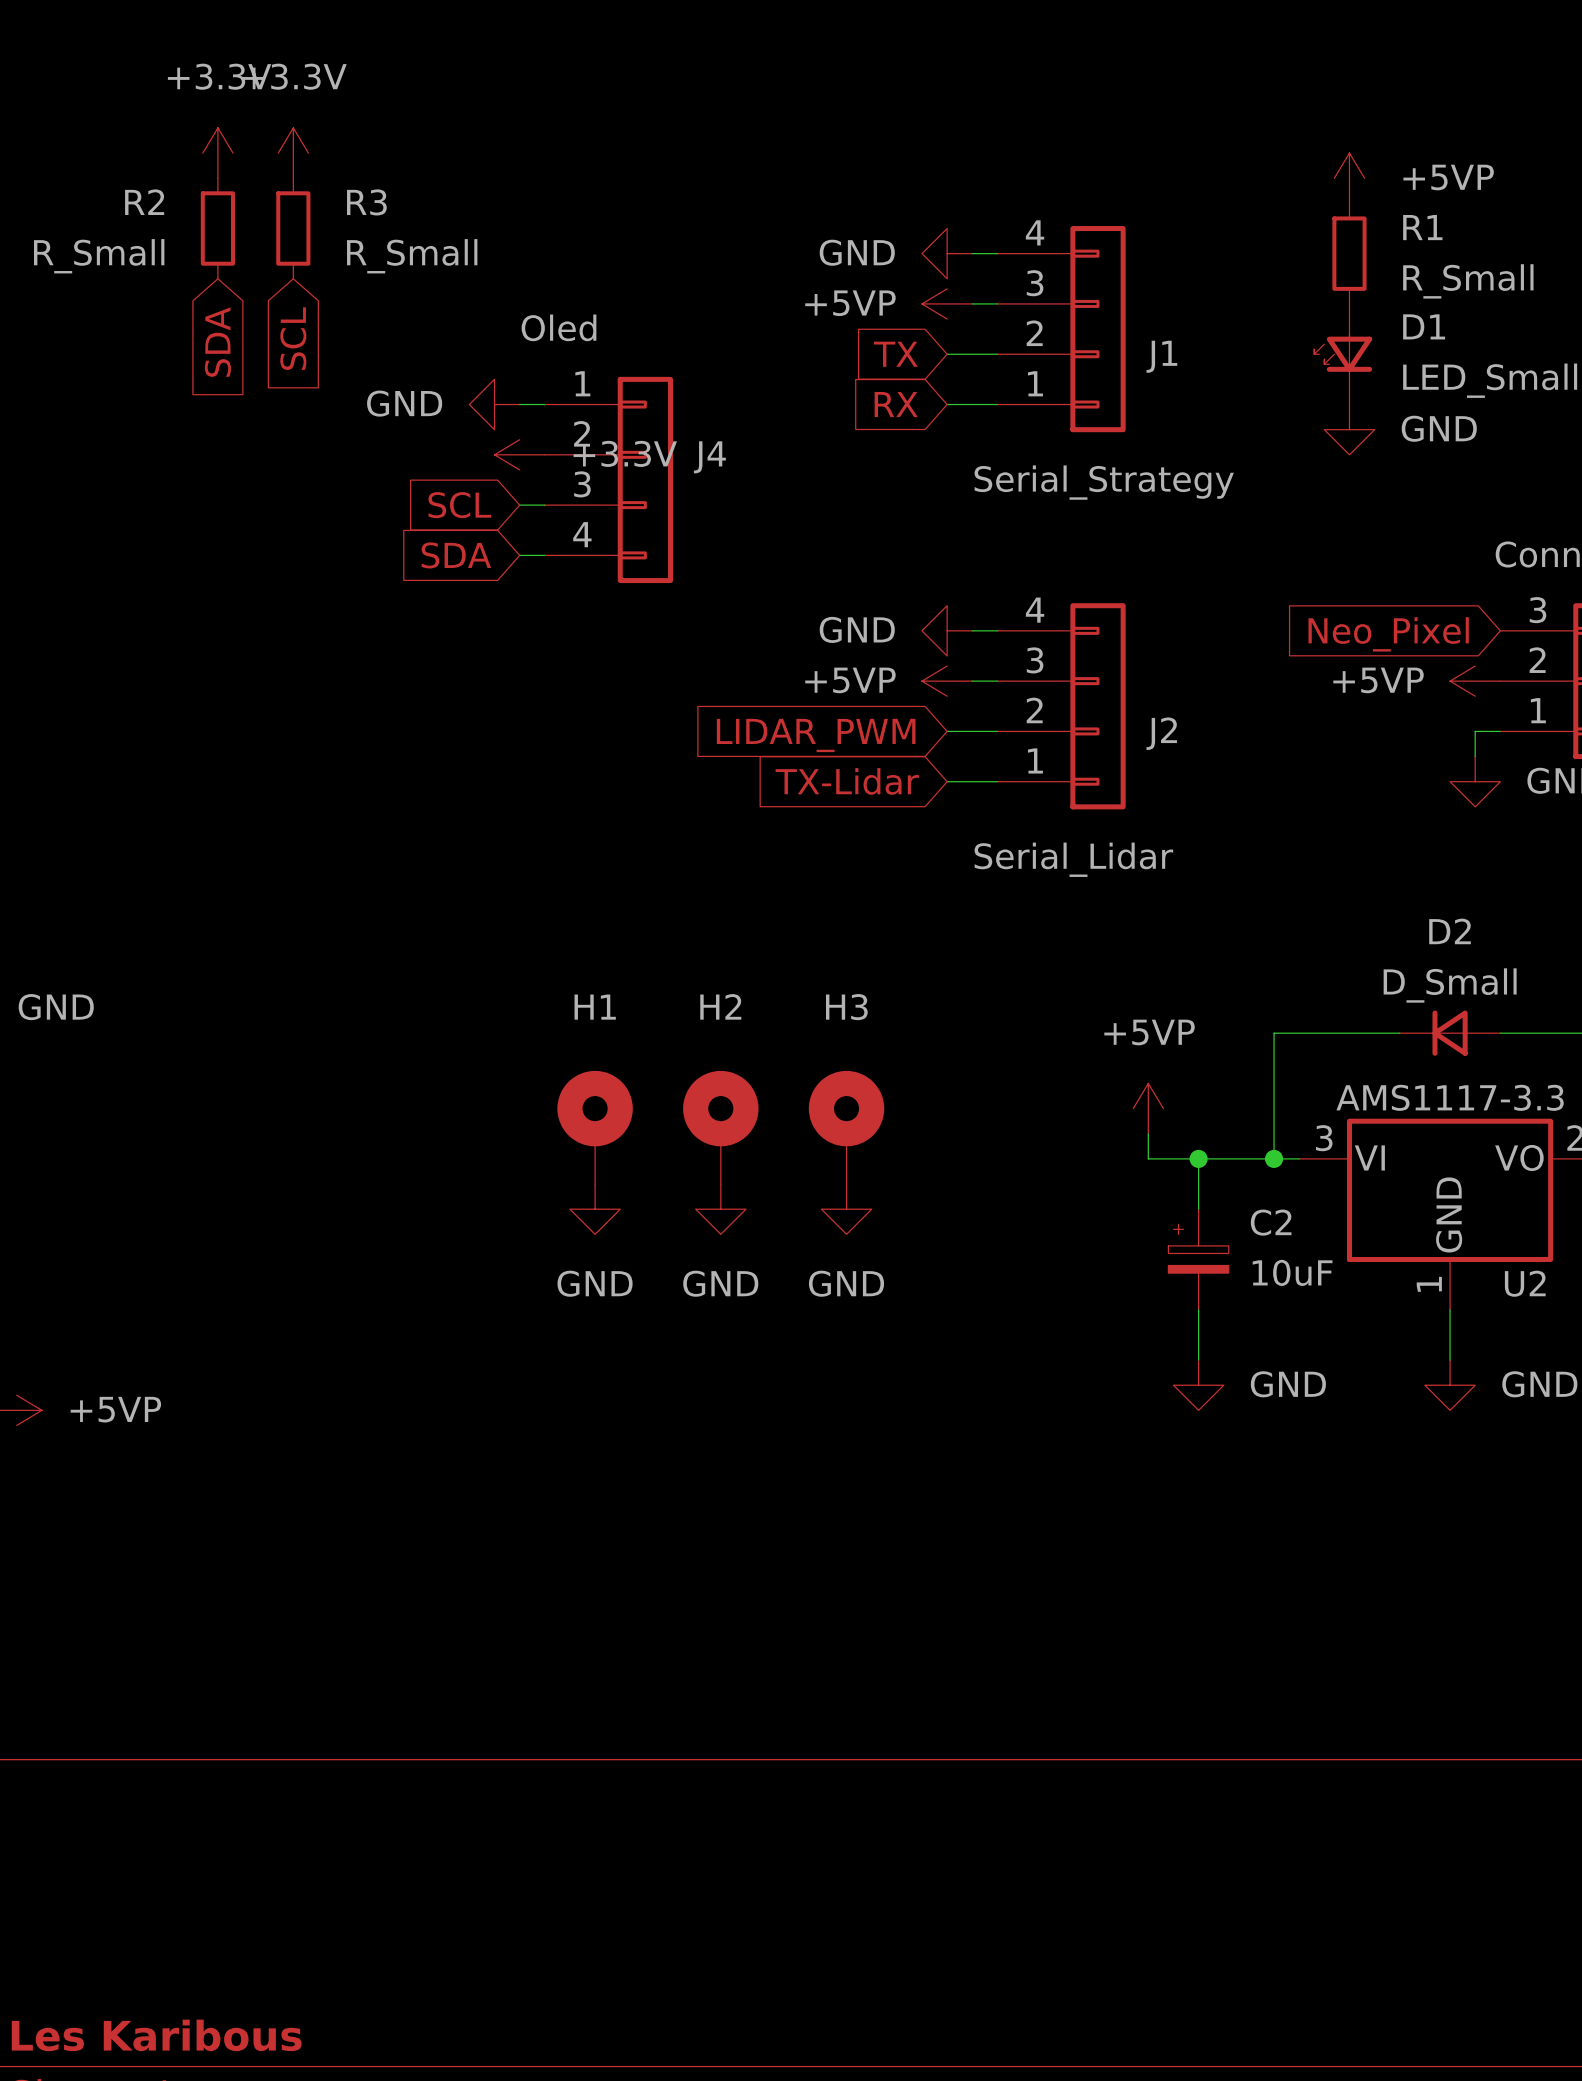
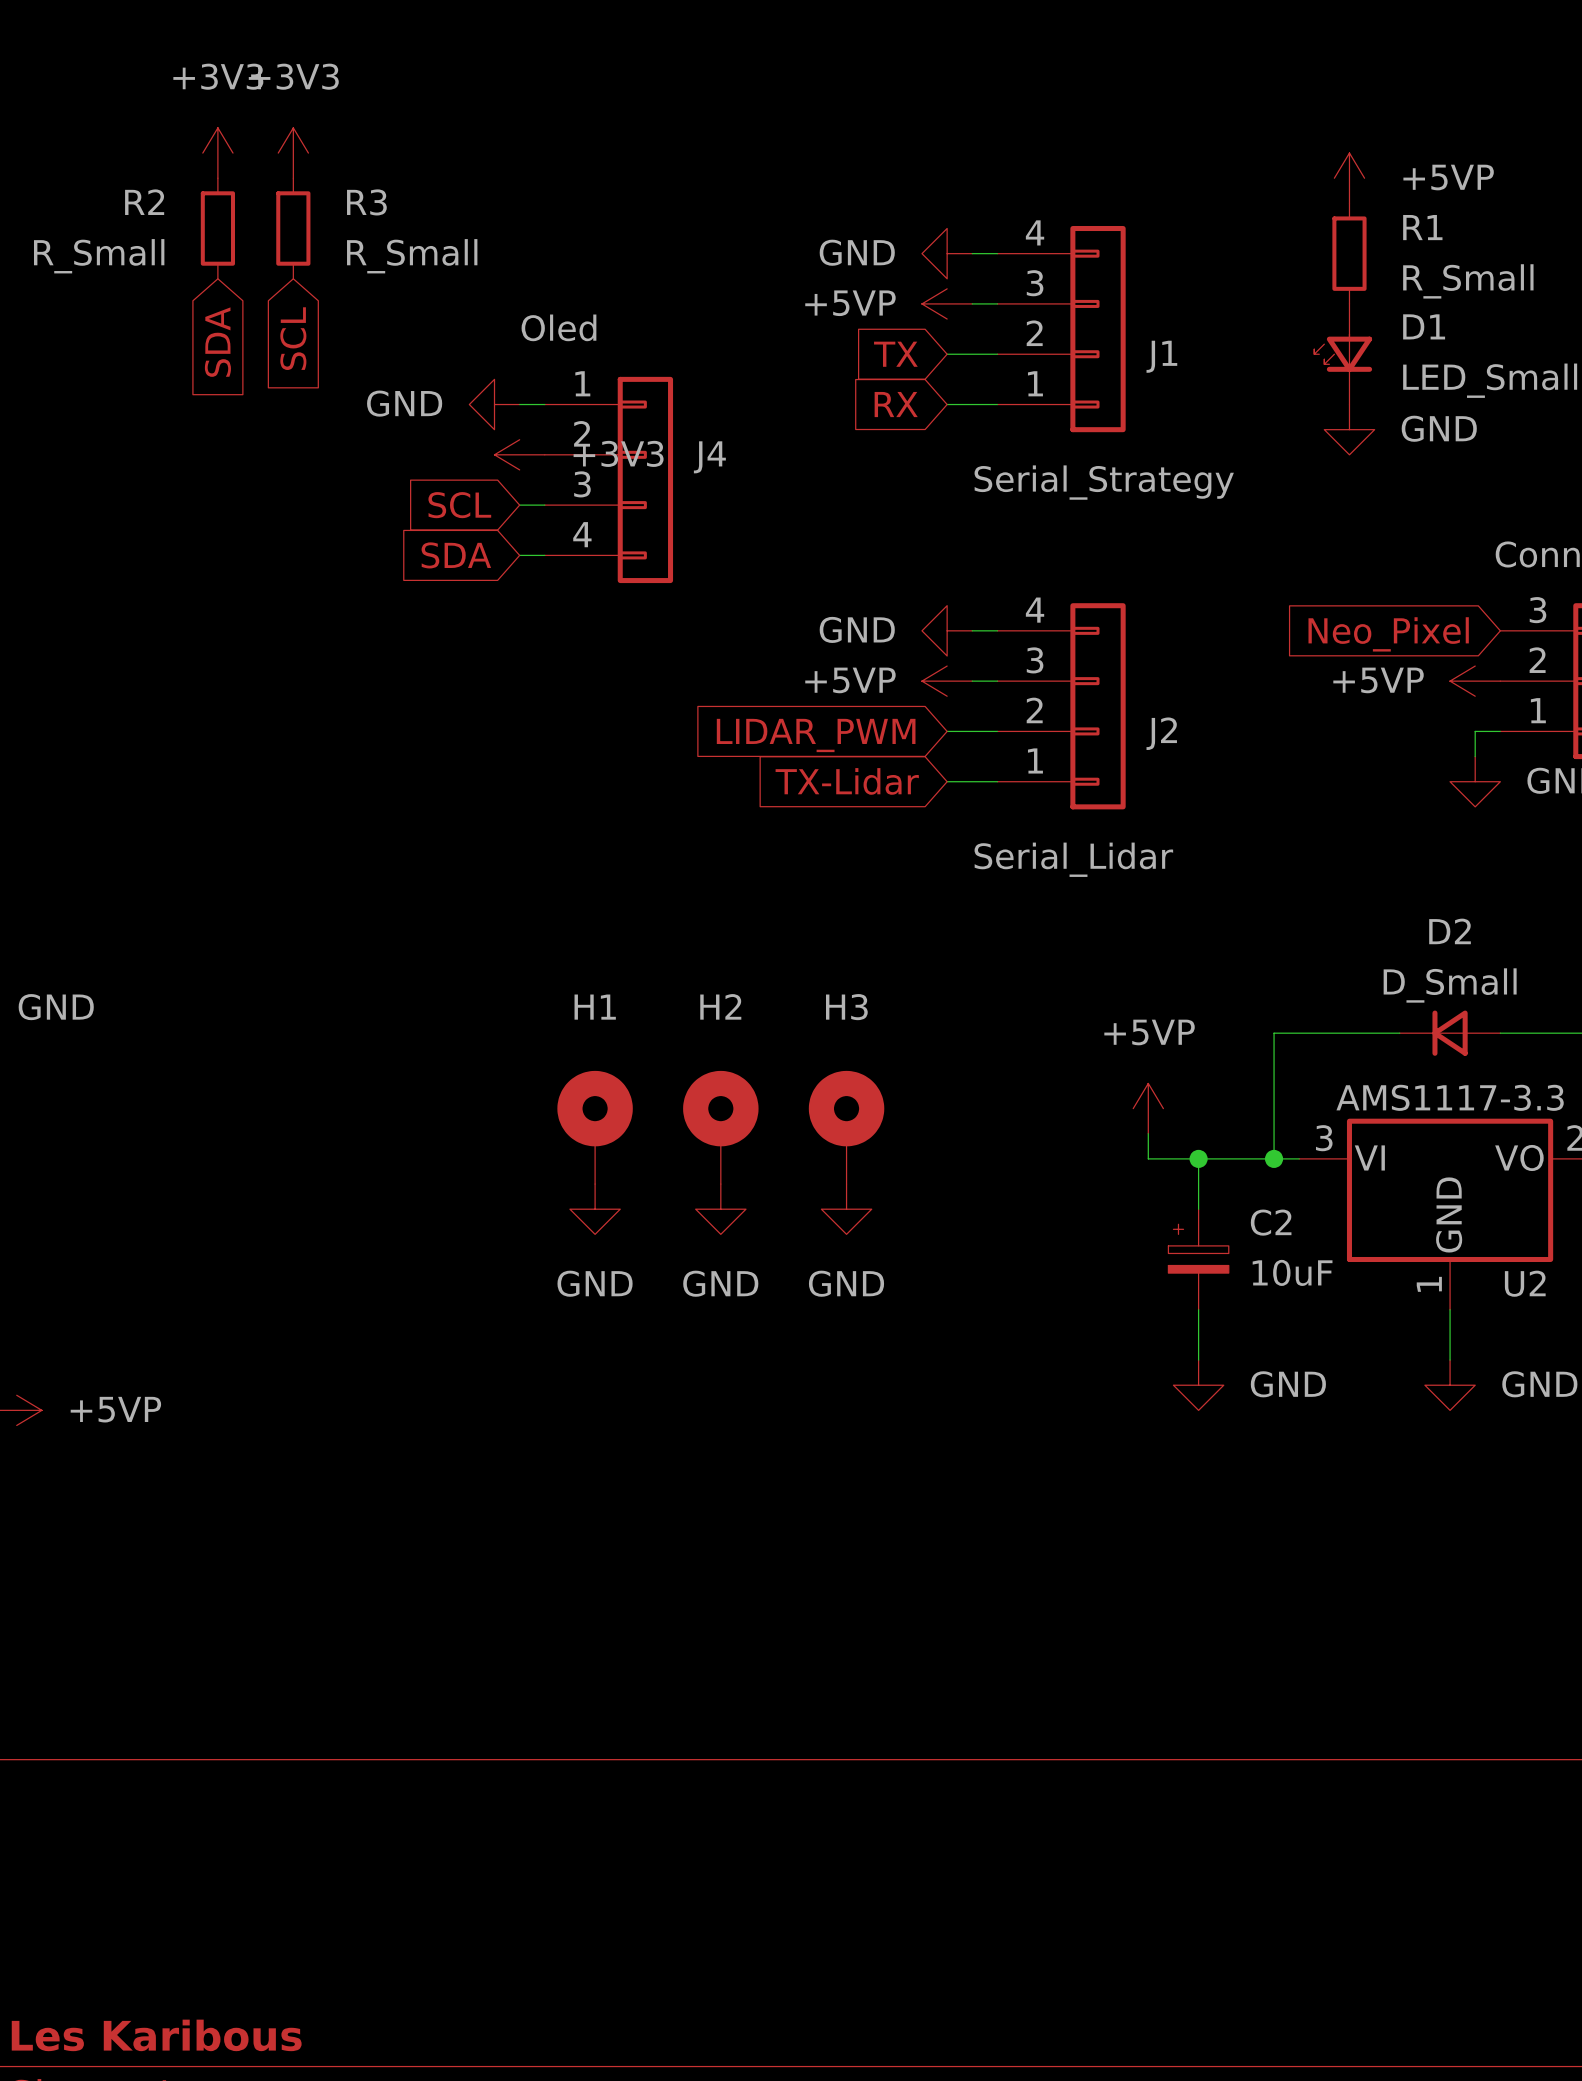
power symbol: +3.3V (217, 153) -> +3V3 (217, 153)
power symbol: +3.3V (293, 153) -> +3V3 (293, 153)
power symbol: +3.3V (519, 454) -> +3V3 (519, 454)

